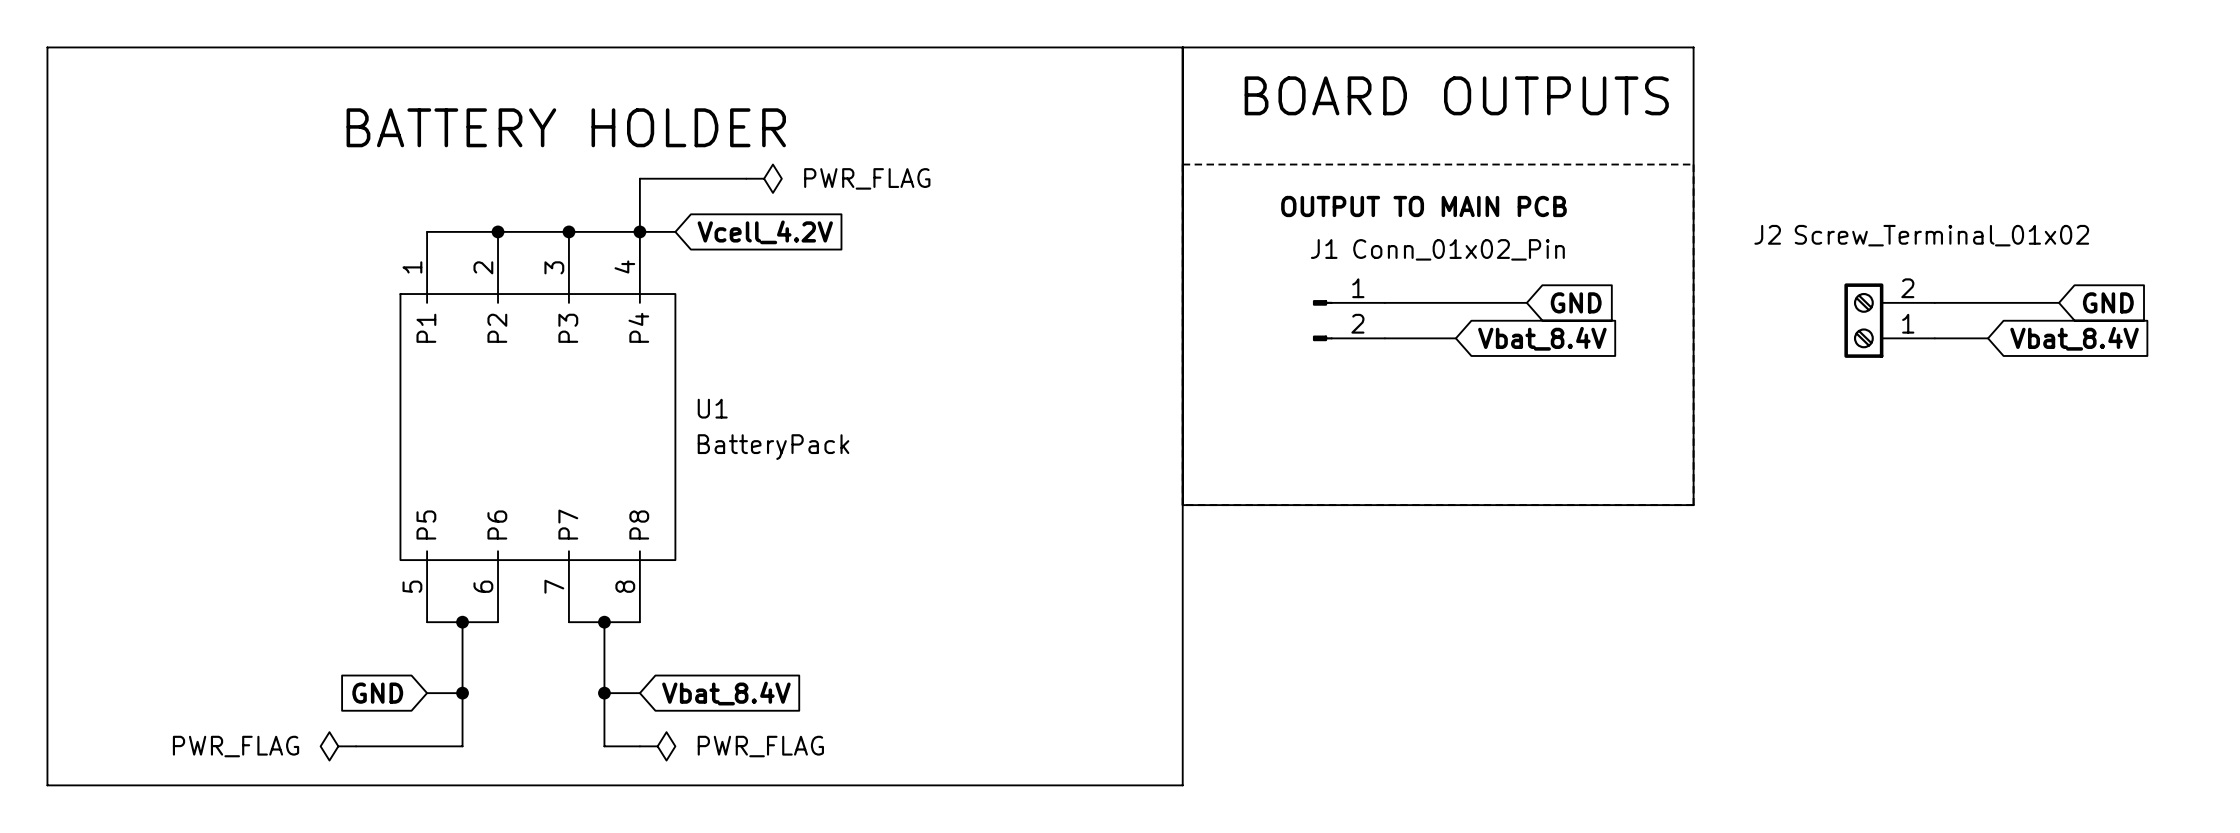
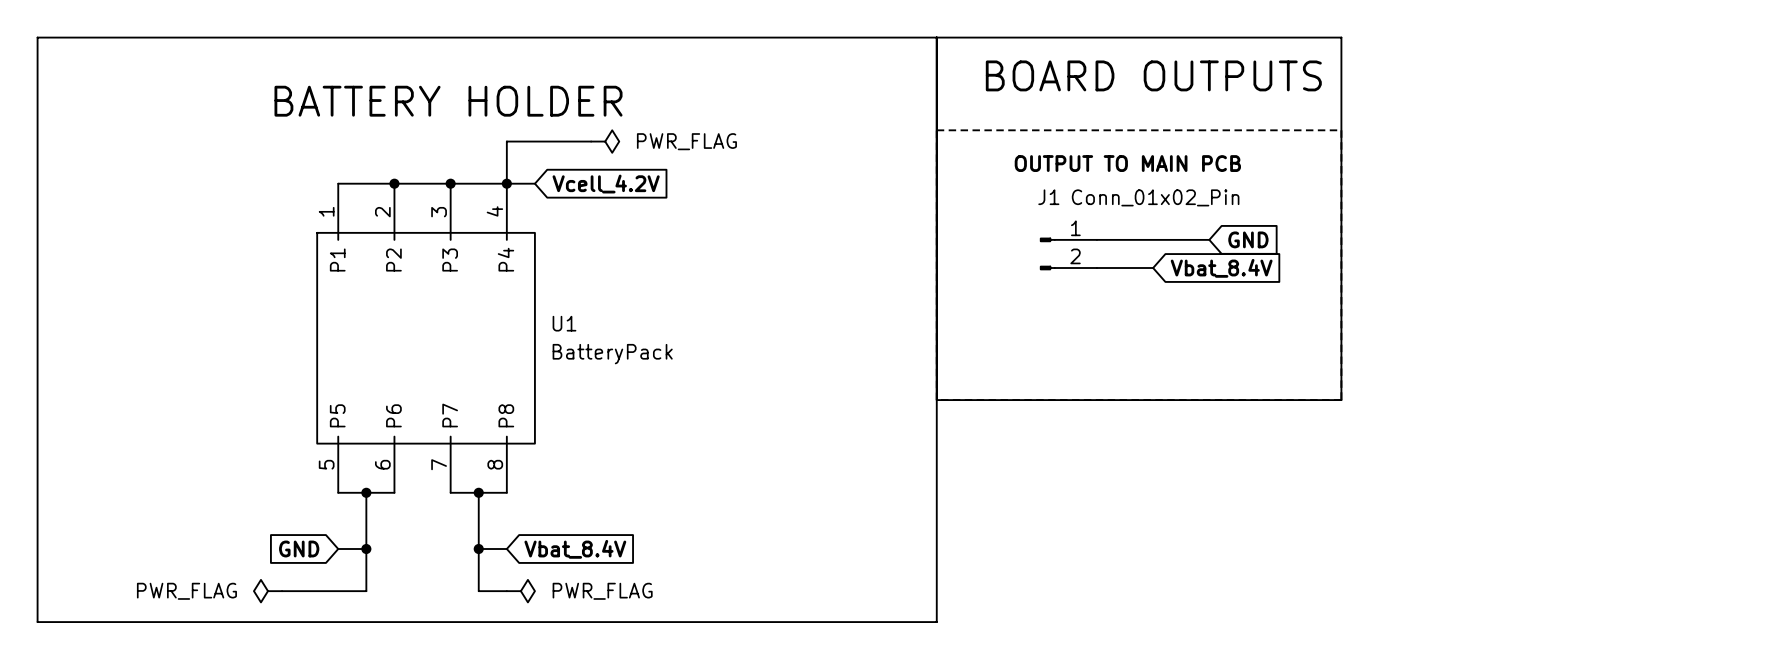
wire: (1934, 302) (2059, 302) -> none
global label: GND (2108, 302) -> none
J2: Screw_Terminal_01x02 (1889, 320) -> none
wire: (1934, 338) (1988, 338) -> none
global label: Vbat_8.4V (2074, 338) -> none

